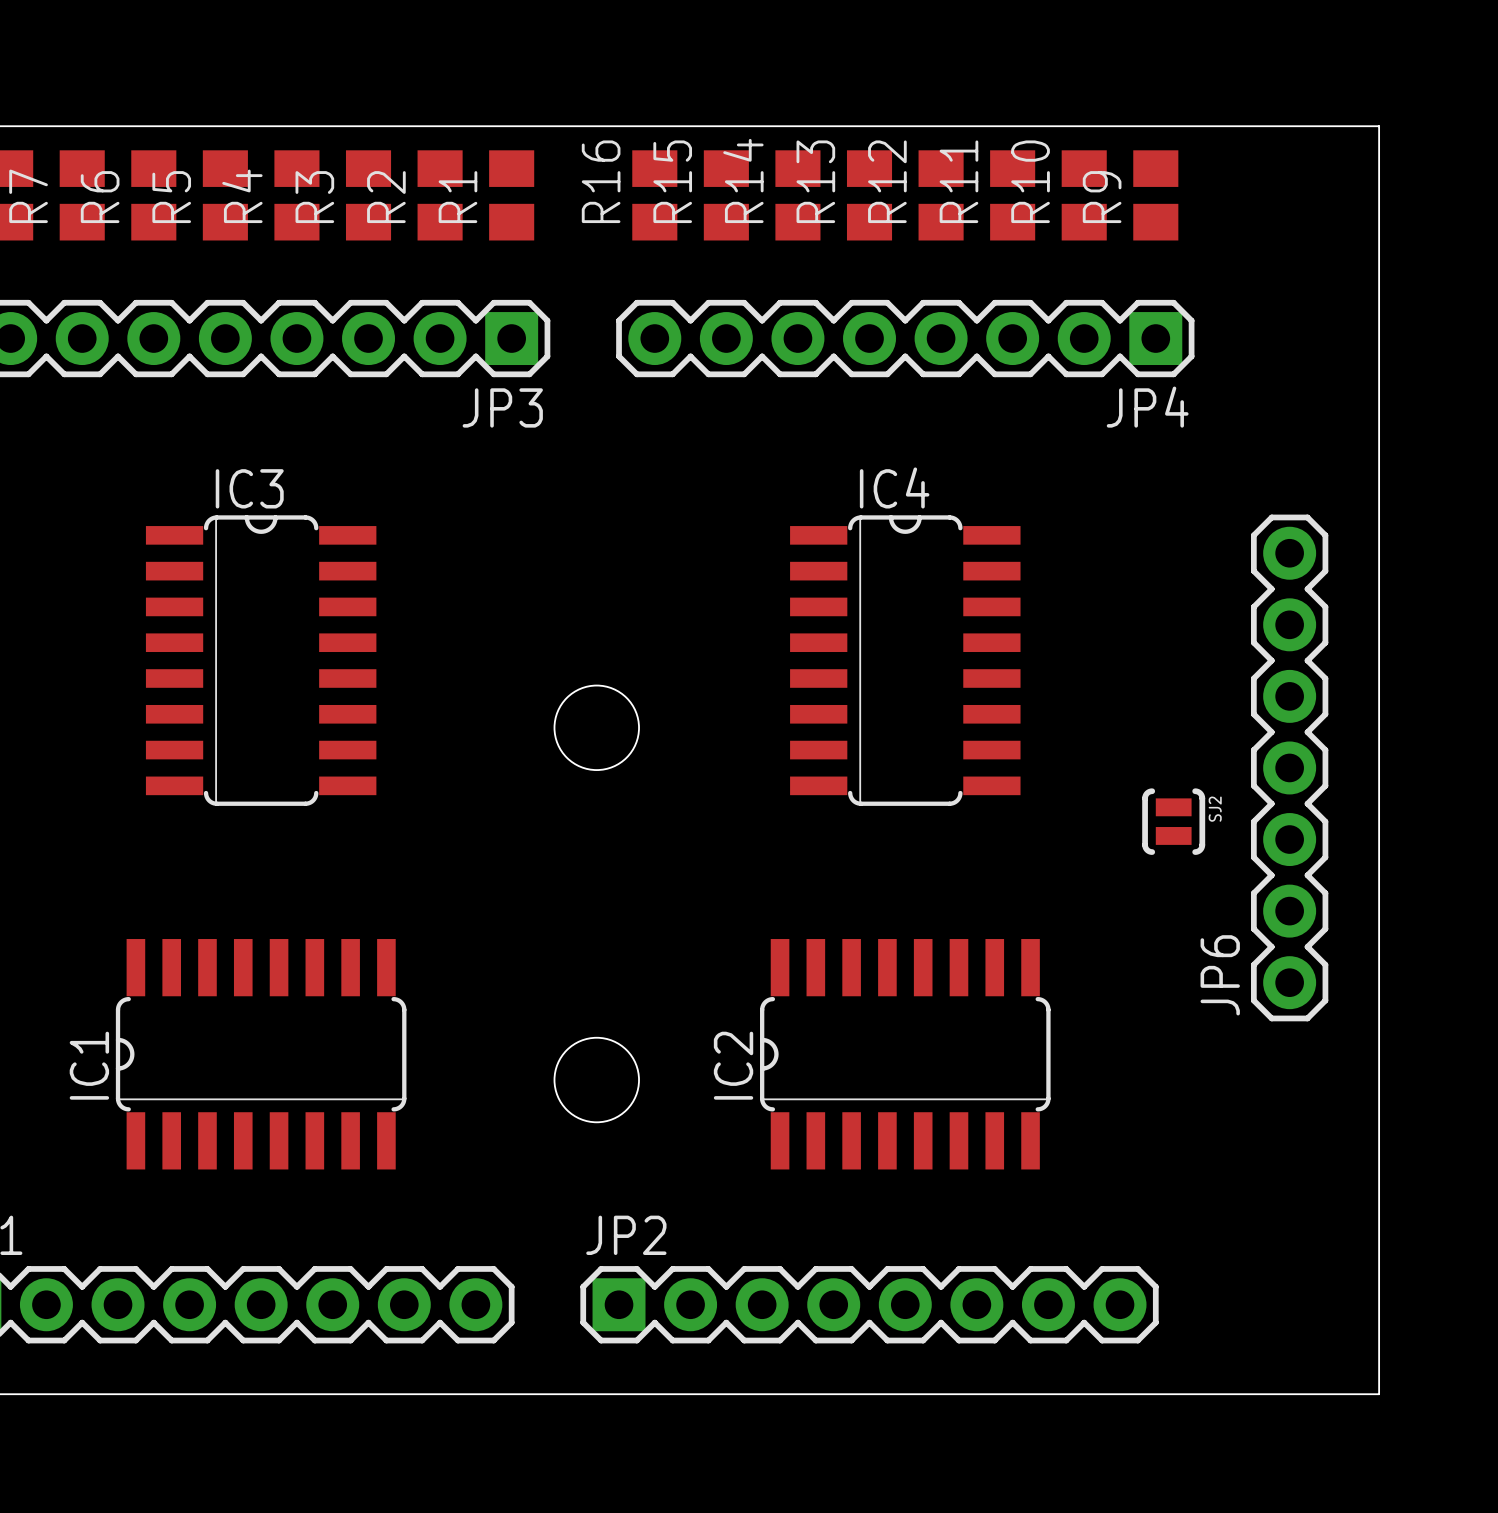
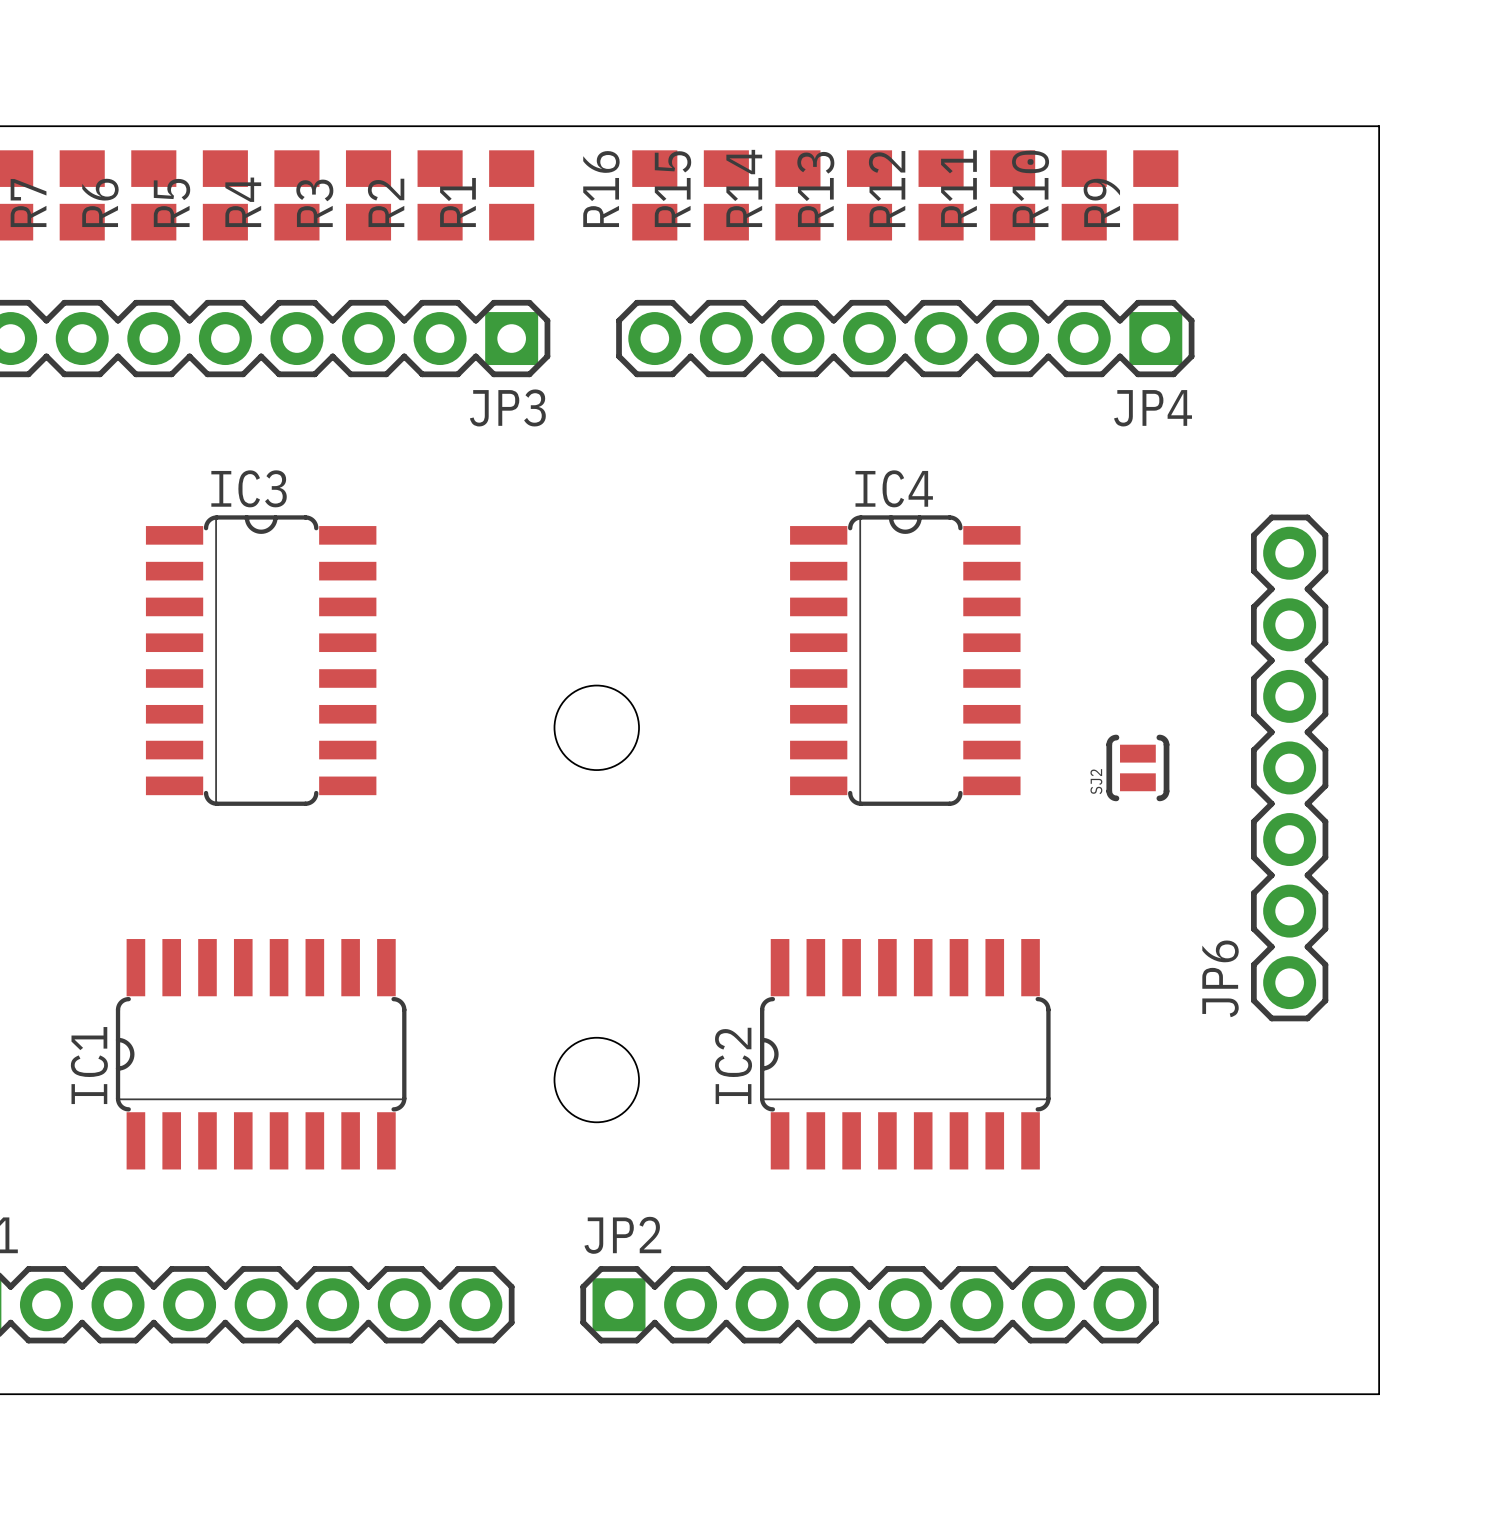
SJ2 name position: SJ2 (1215, 809) -> SJ2 (1096, 781)
SJ2 position: (1173, 821) -> (1137, 767)

